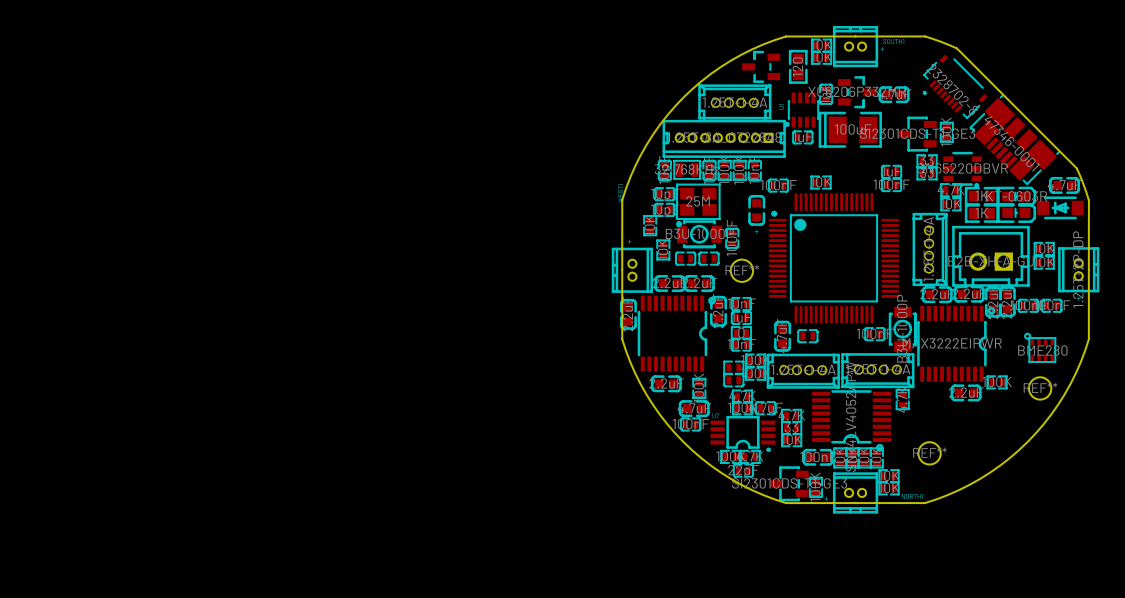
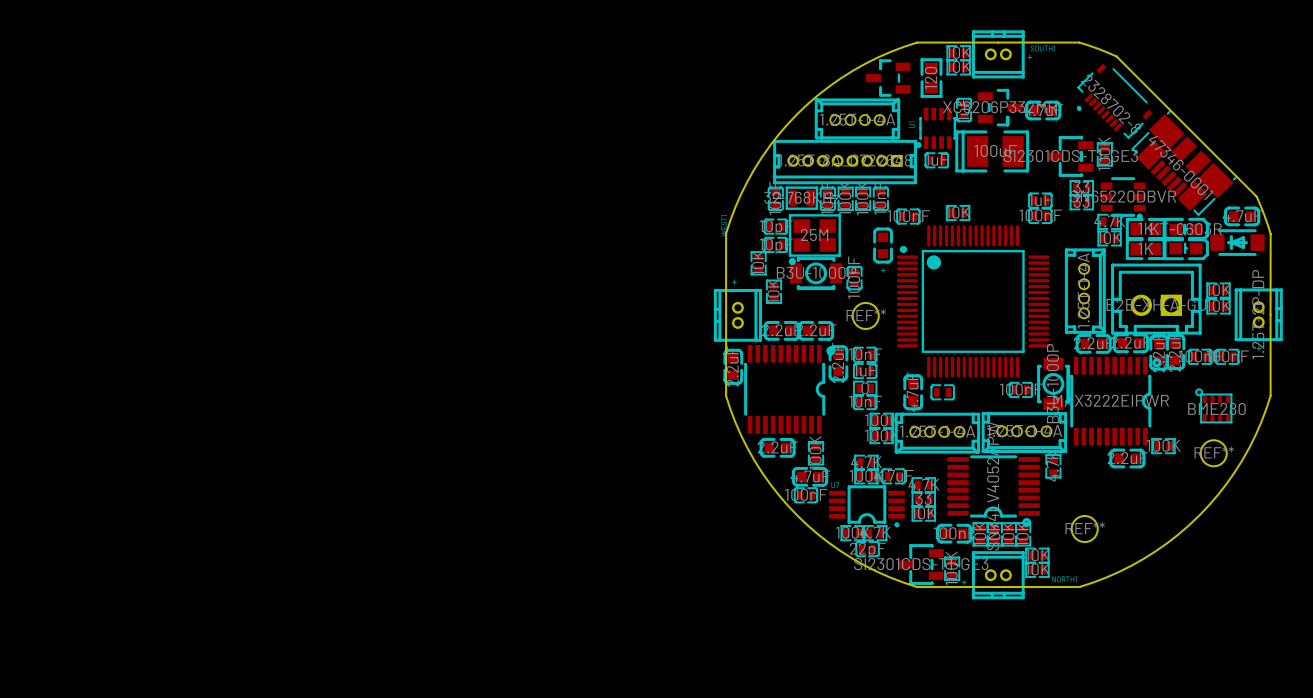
part: (685, 258) -> none
part: (708, 258) -> none
part: (733, 367) -> none
part: (733, 380) -> none

